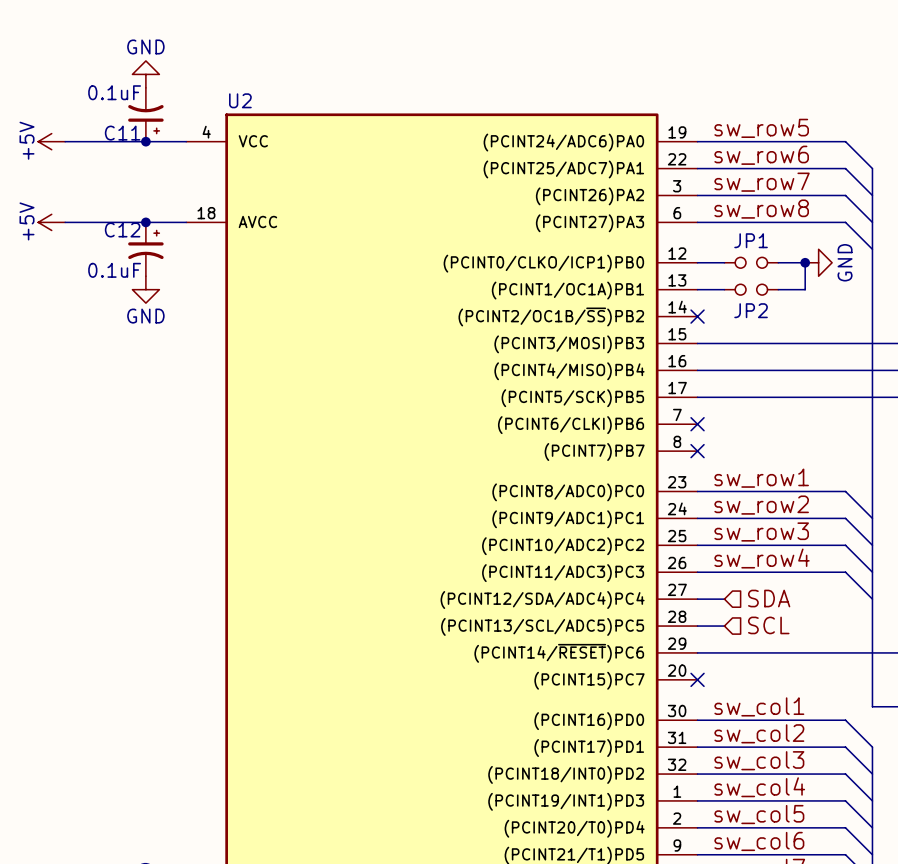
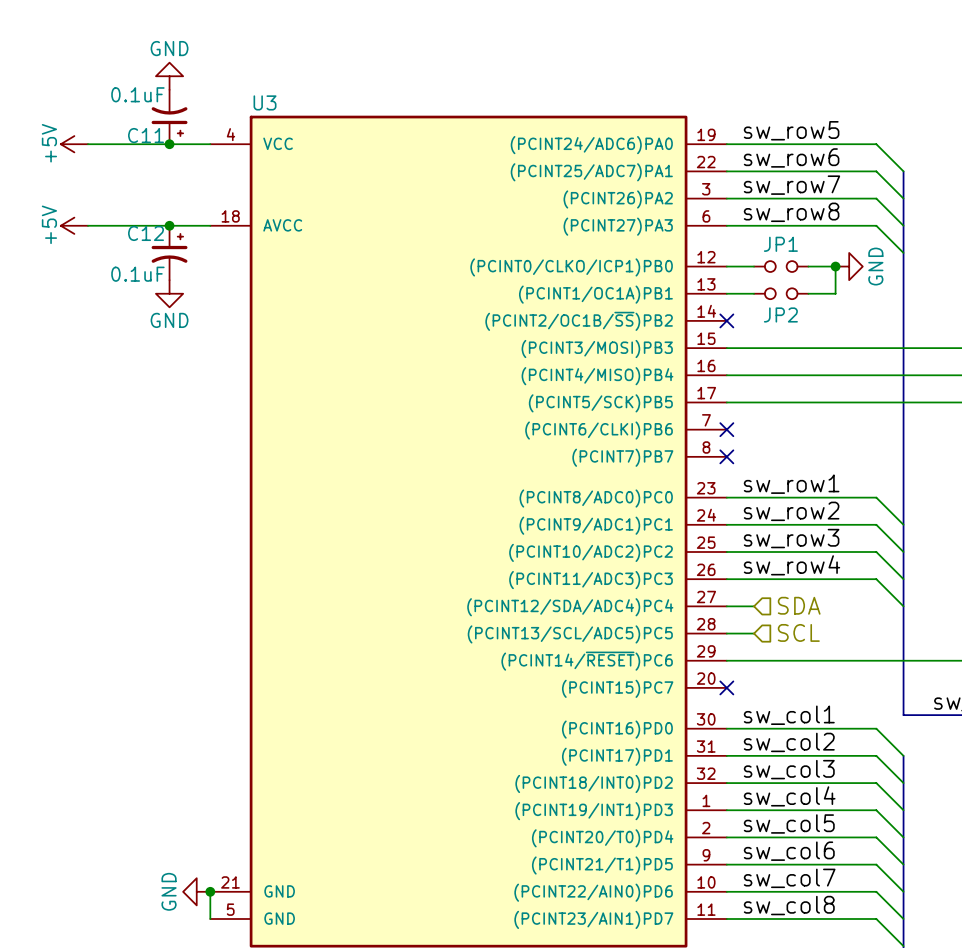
U2 name: U2 (240, 100) -> U3 (265, 102)

